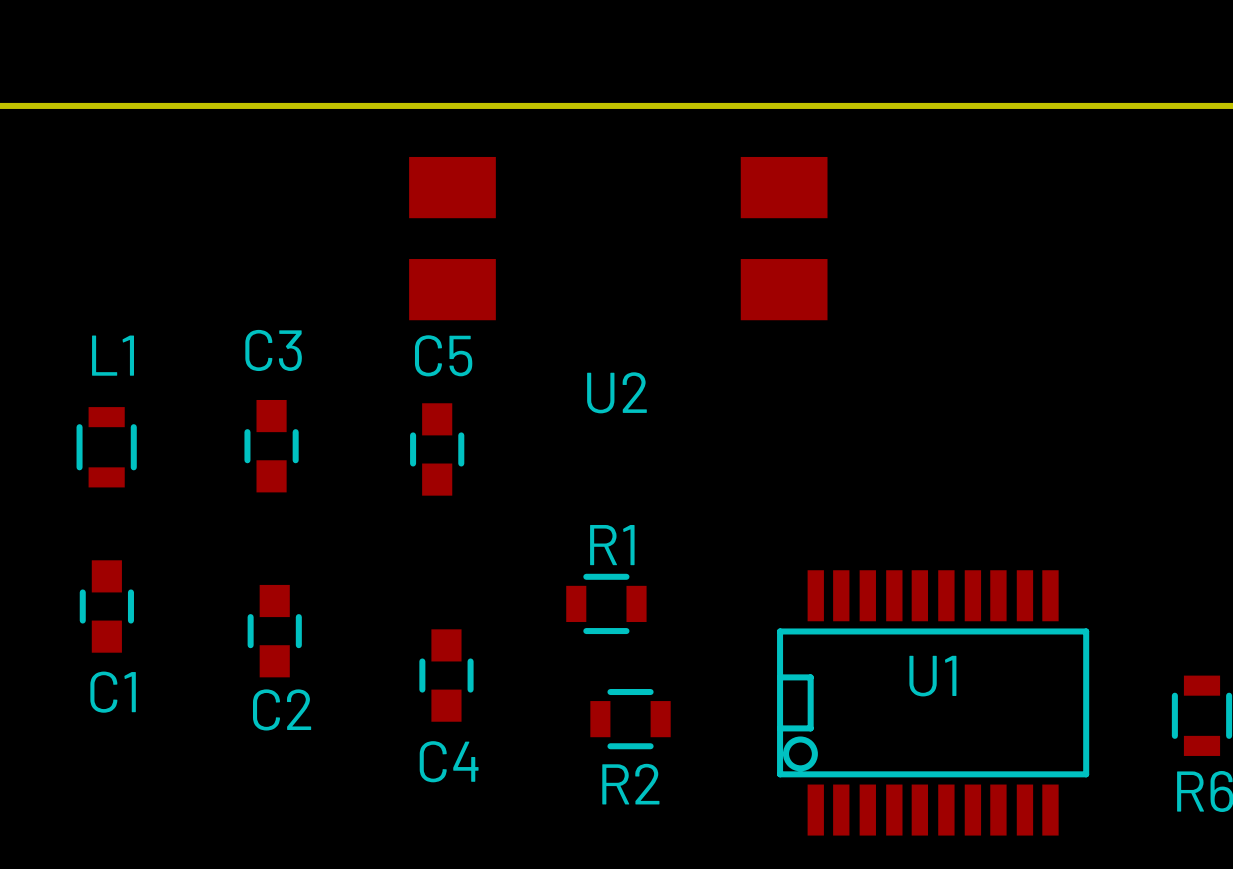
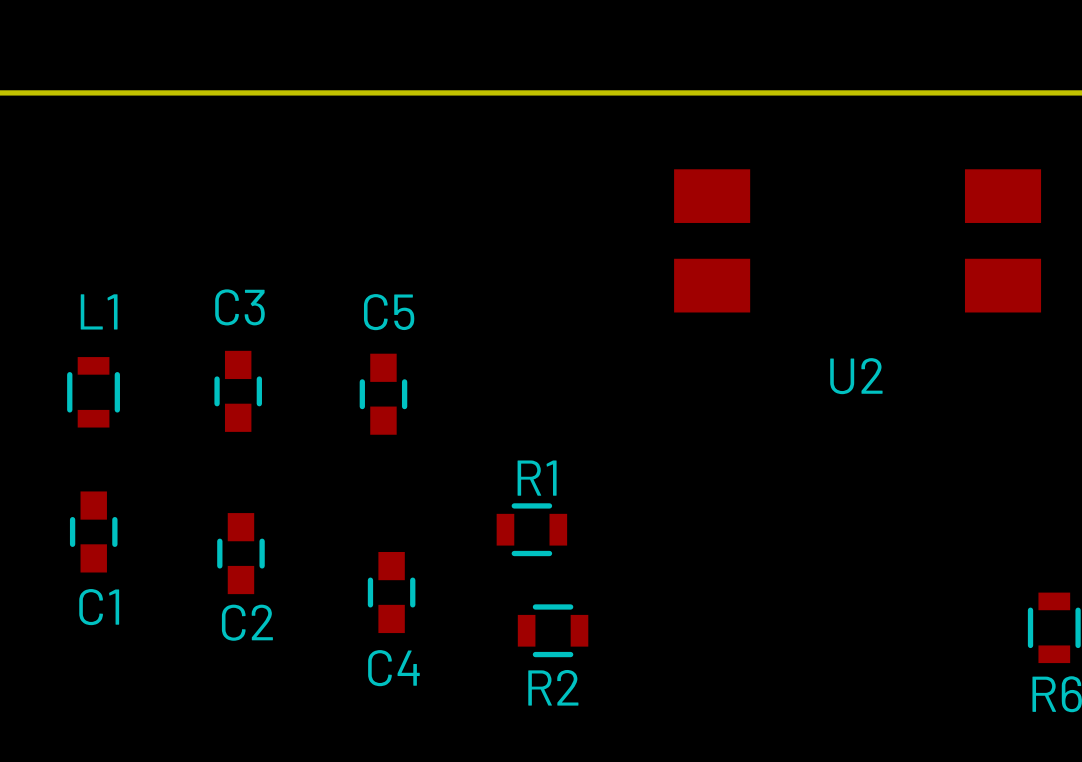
U2 position: (618, 238) -> (857, 240)
U1: (933, 702) -> none

